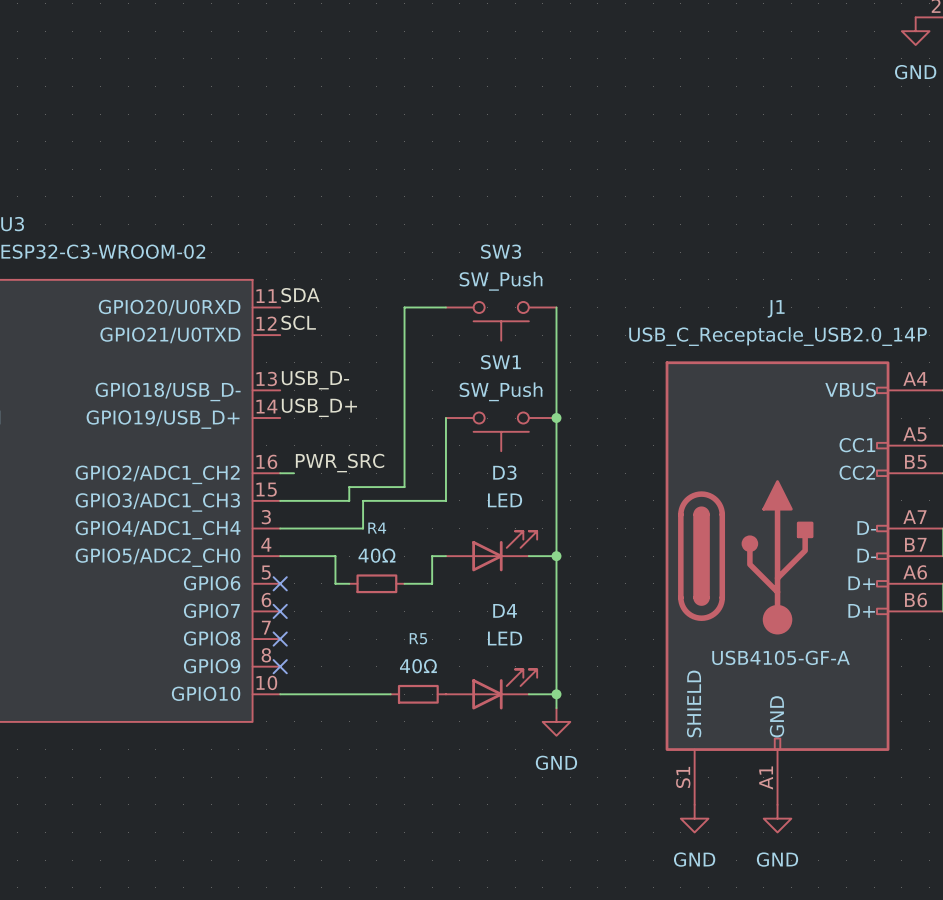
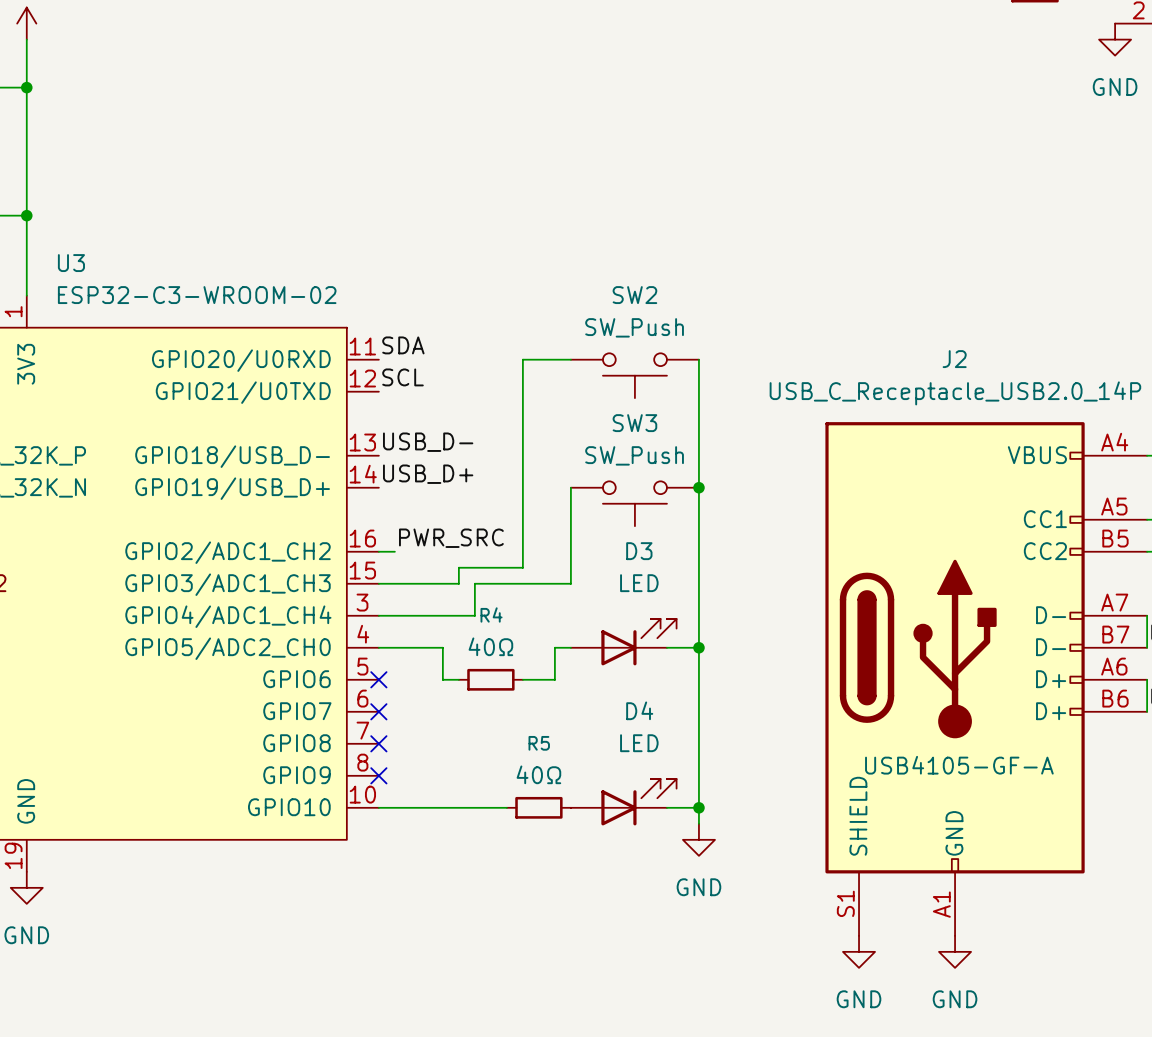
SW3 name: SW3 (501, 251) -> SW2 (634, 295)
J1 name: J1 (776, 308) -> J2 (954, 359)
SW1 name: SW1 (500, 362) -> SW3 (634, 423)

